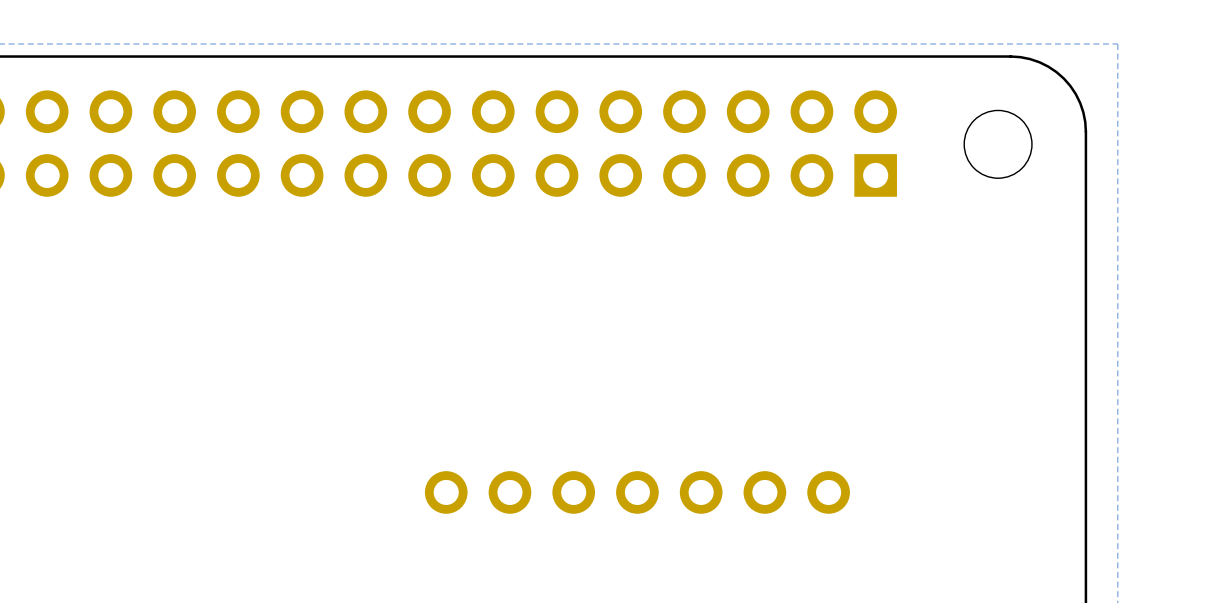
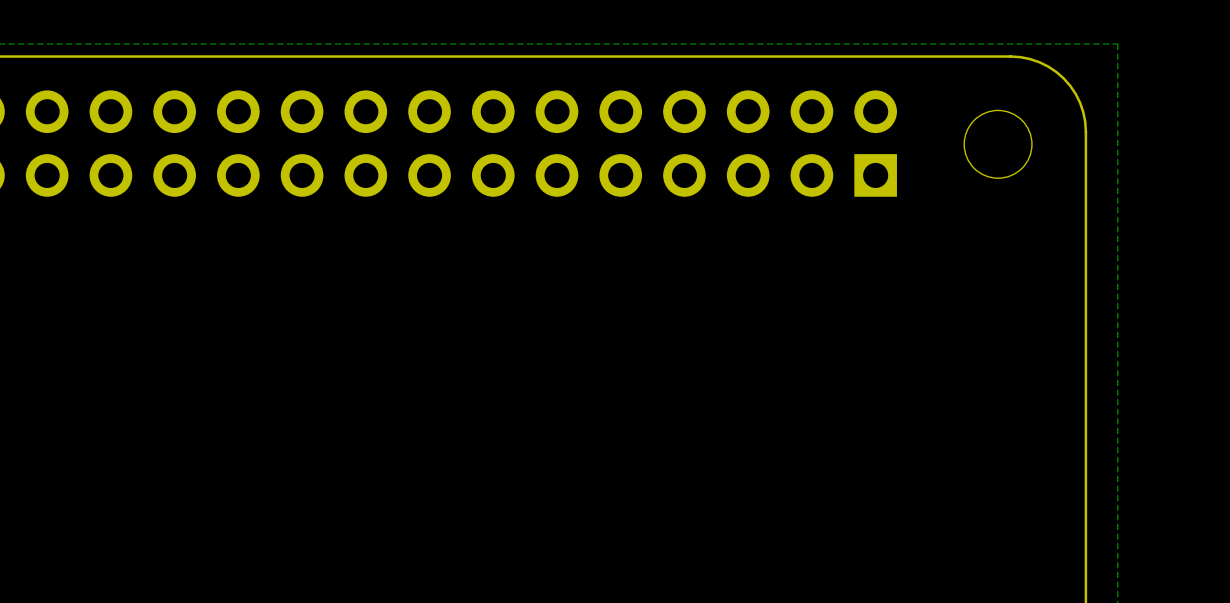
part: (637, 492) -> none

